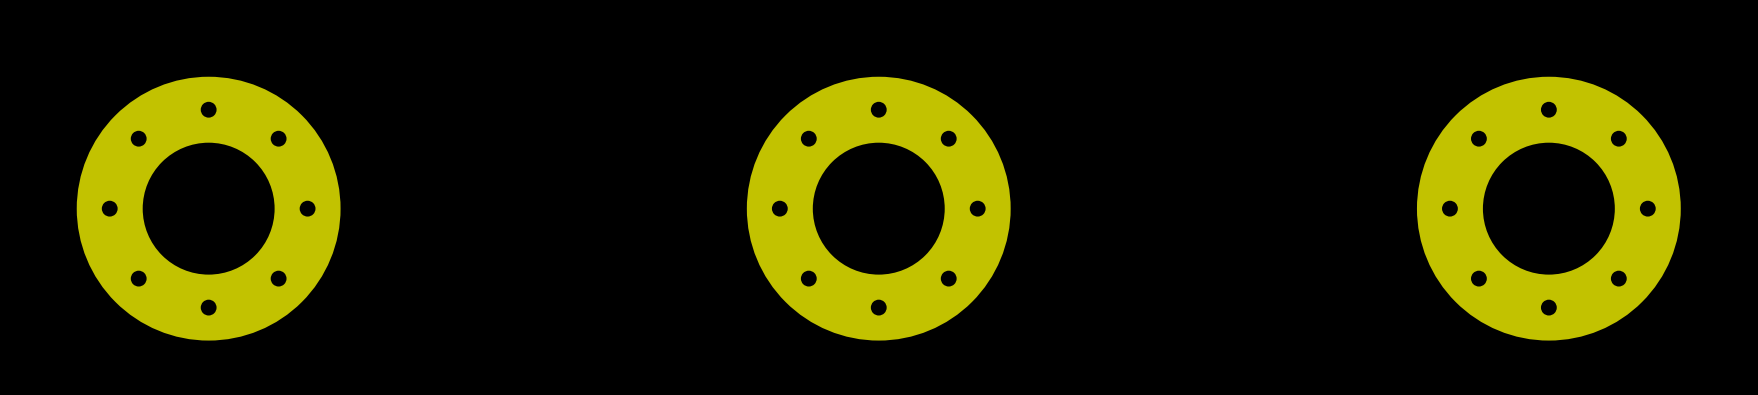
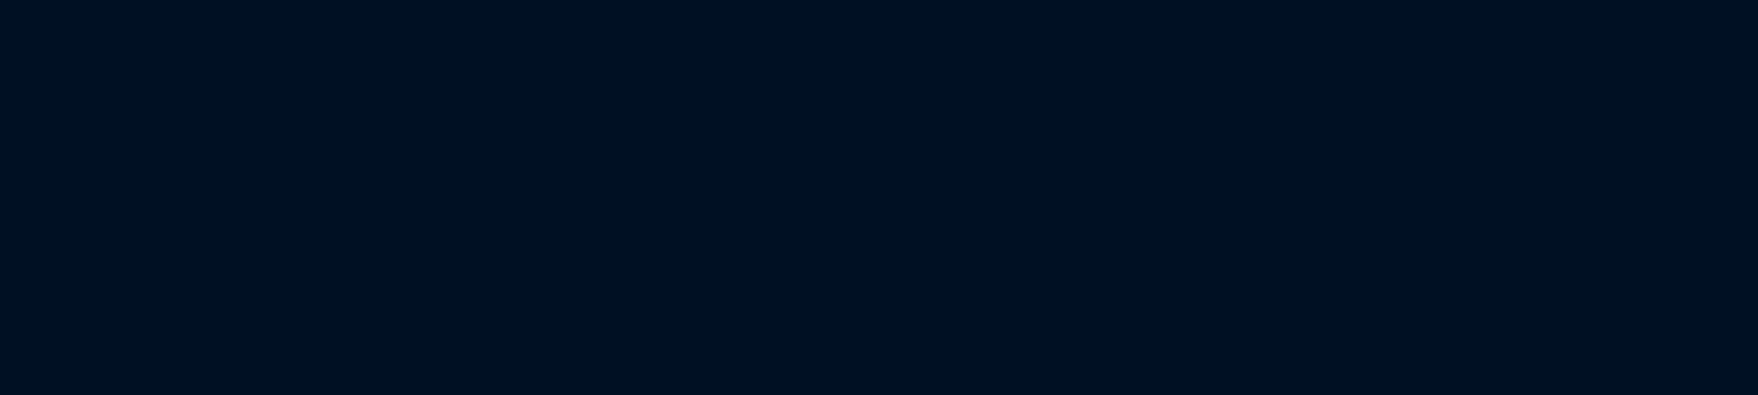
part: (208, 208) -> none
part: (878, 208) -> none
part: (1548, 208) -> none

